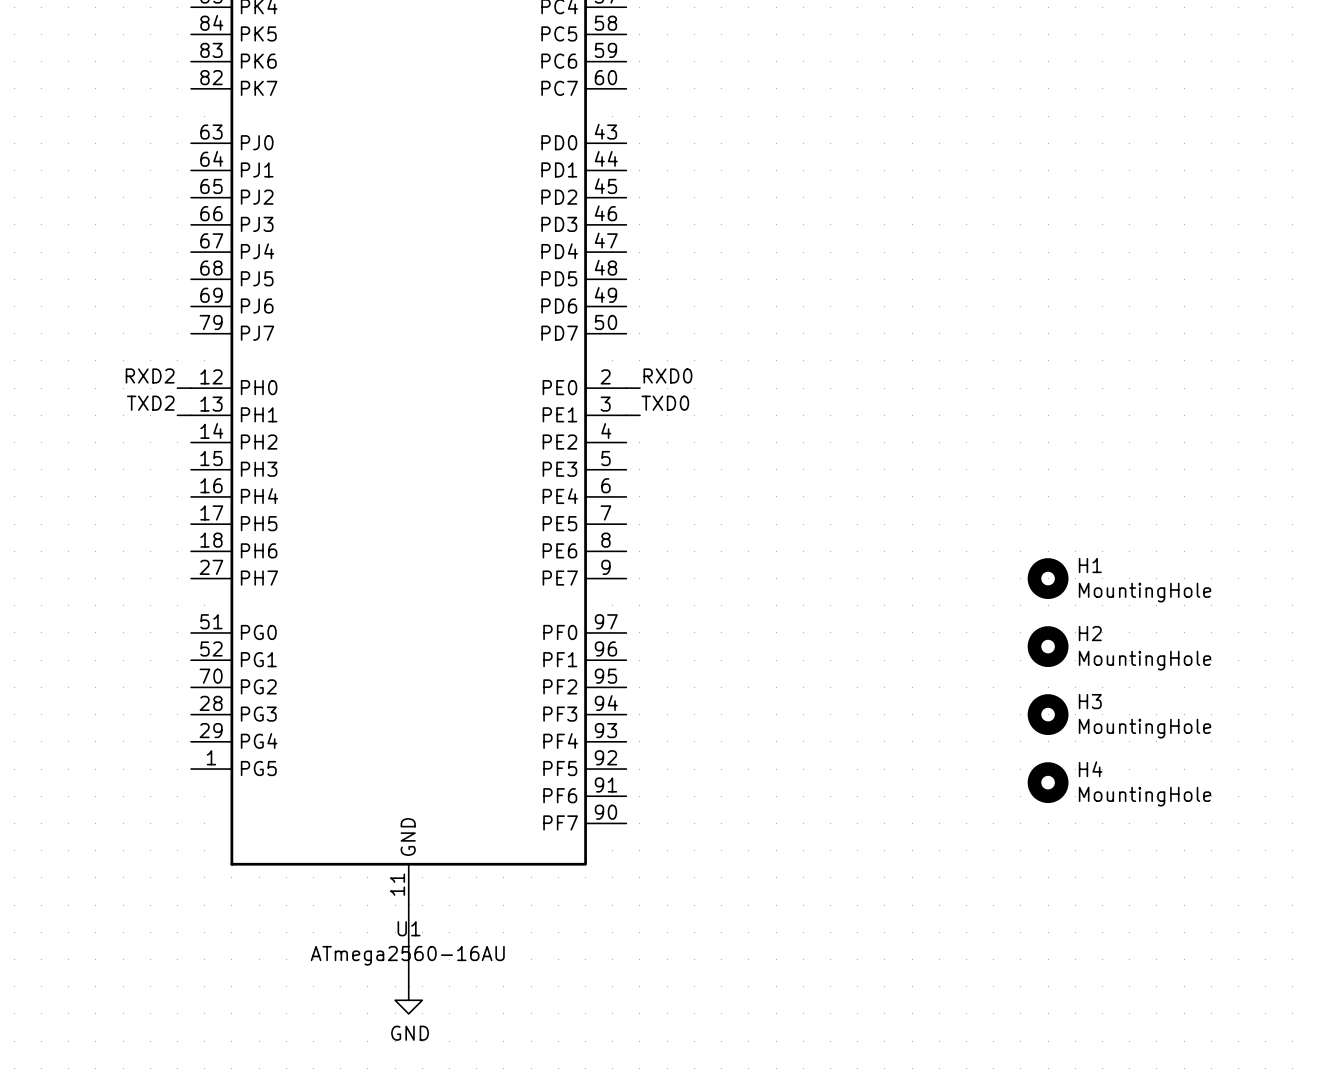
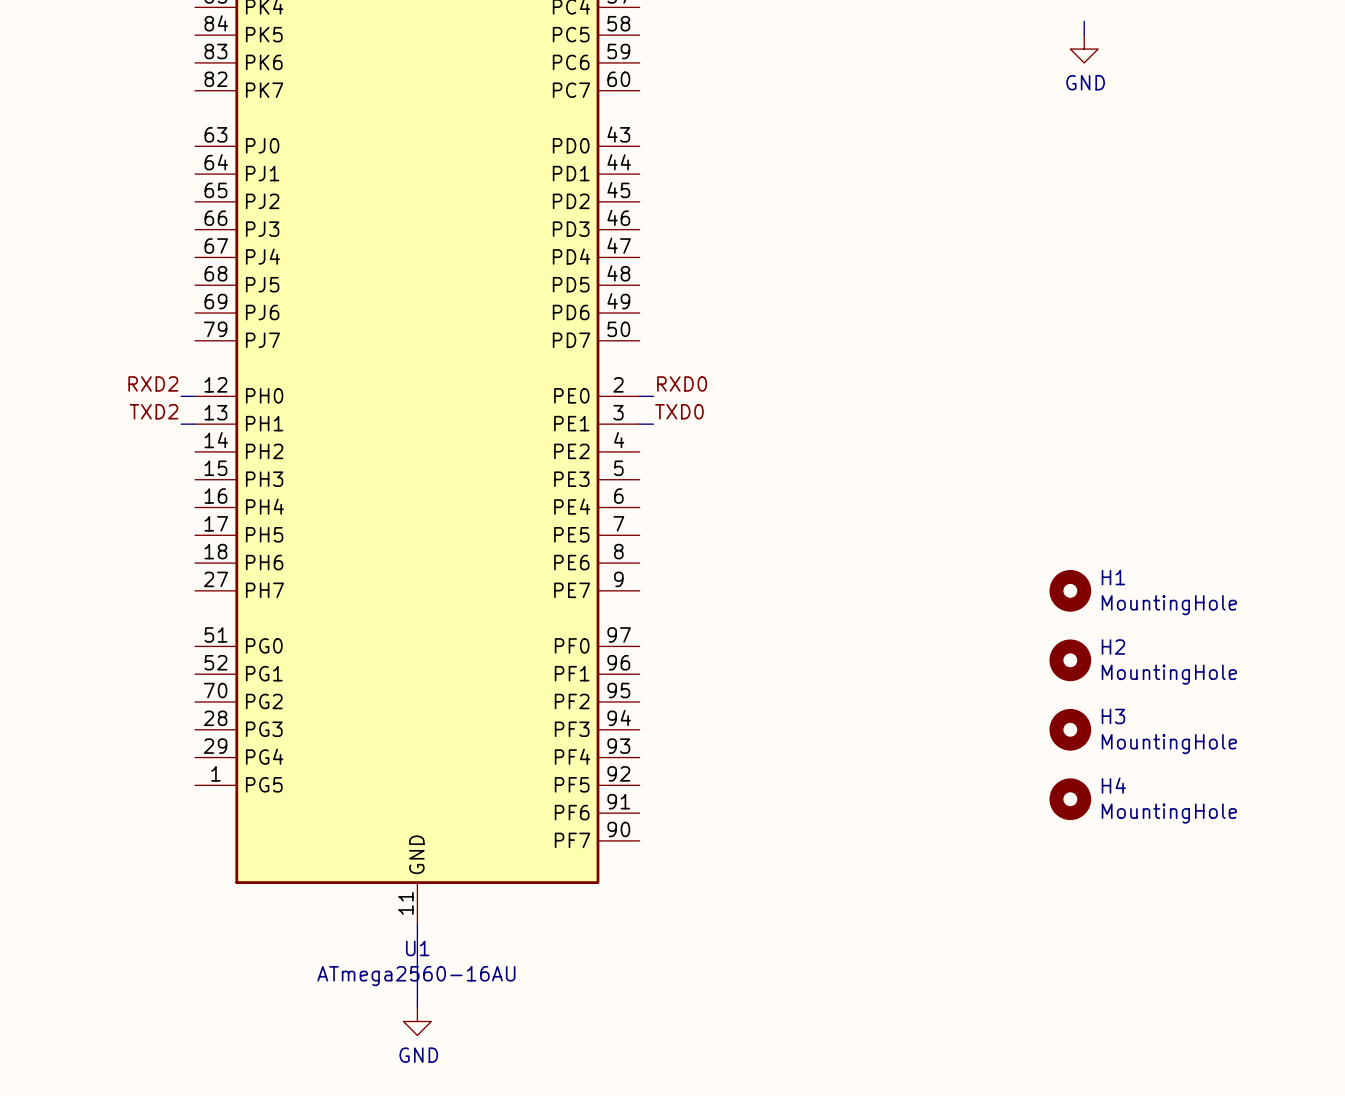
wire: none -> (1084, 21) (1084, 35)
power symbol: none -> GND (1084, 49)

